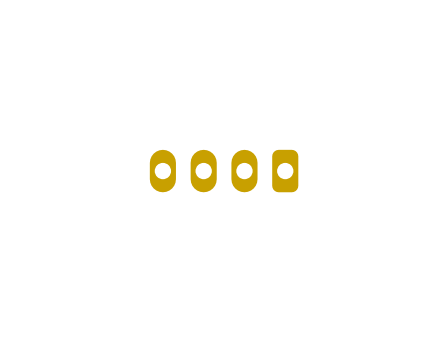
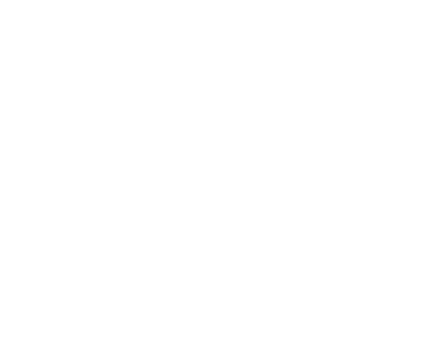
part: (224, 171) -> none

